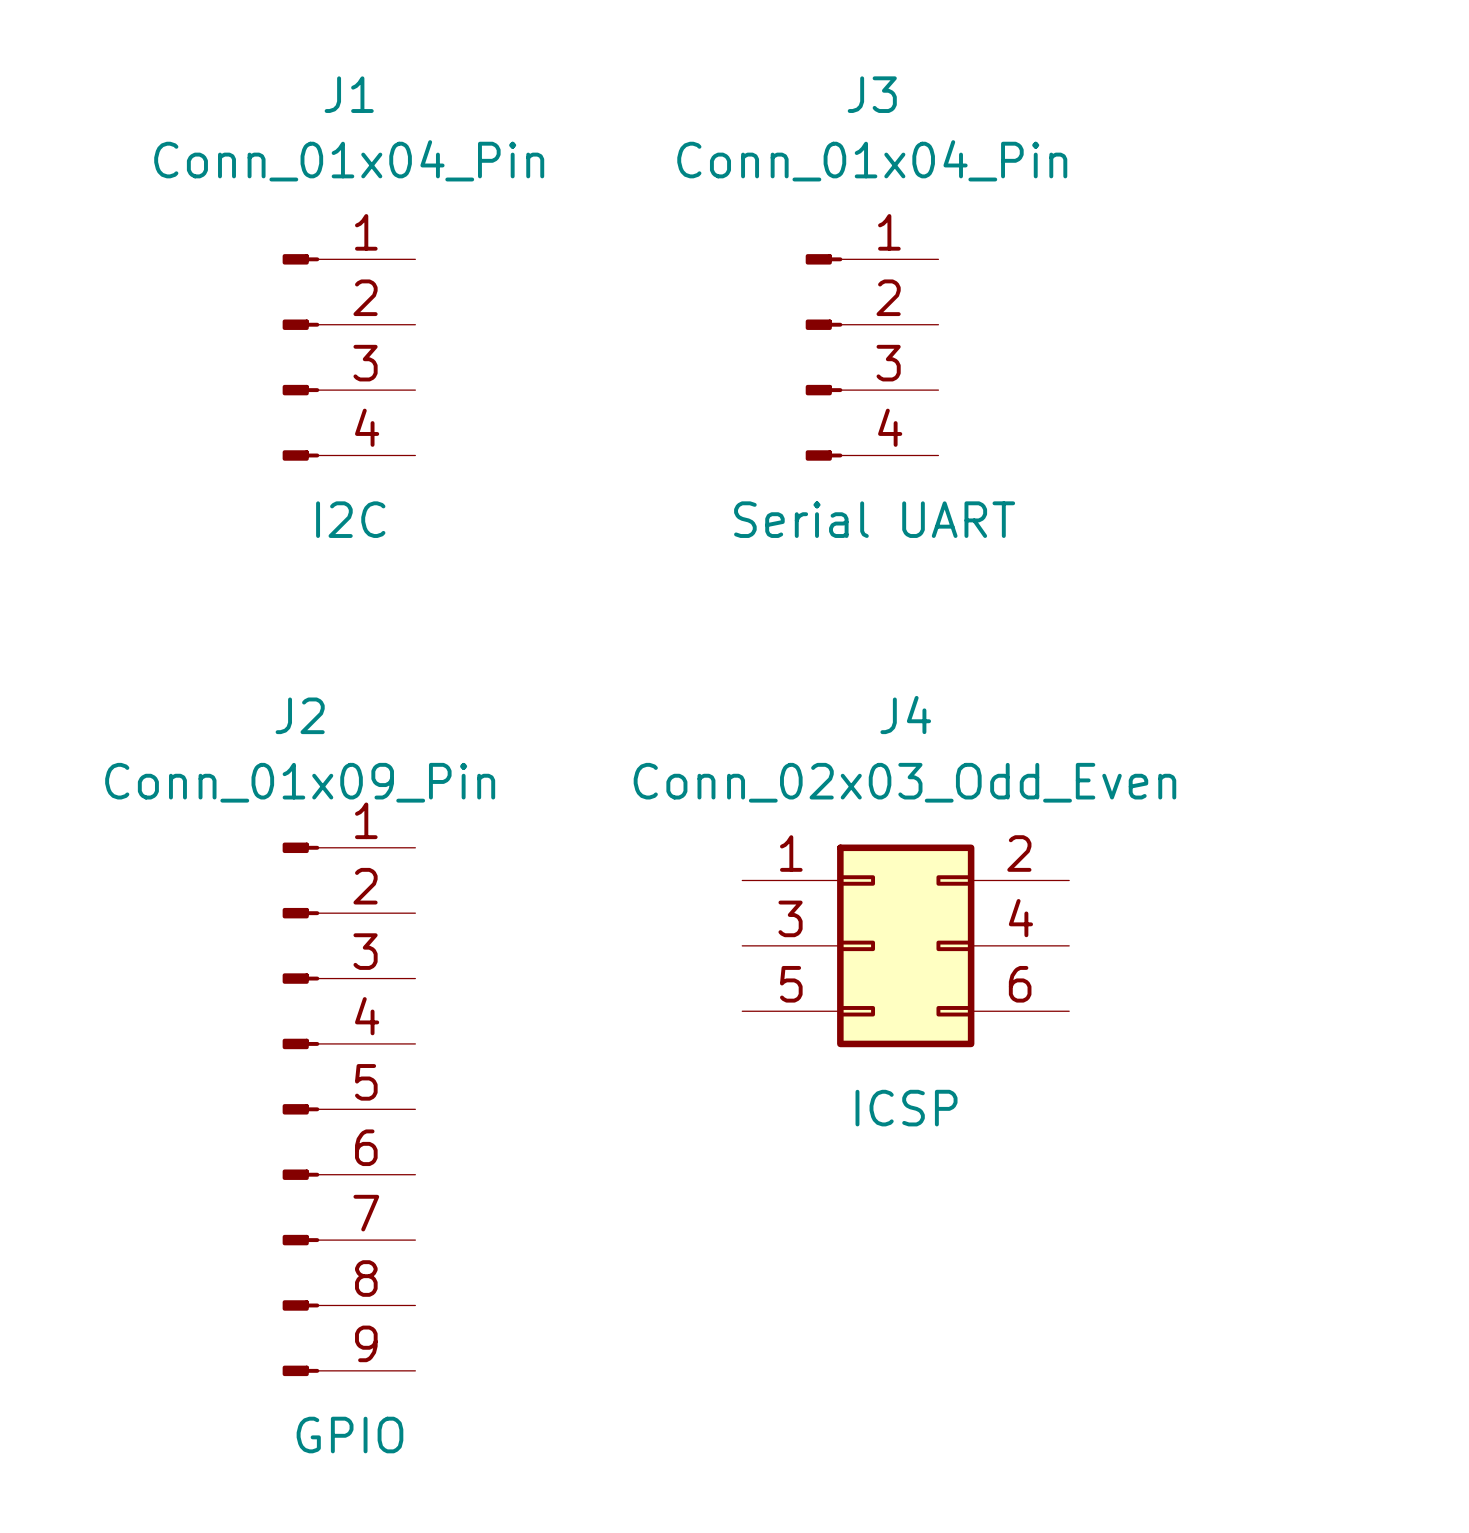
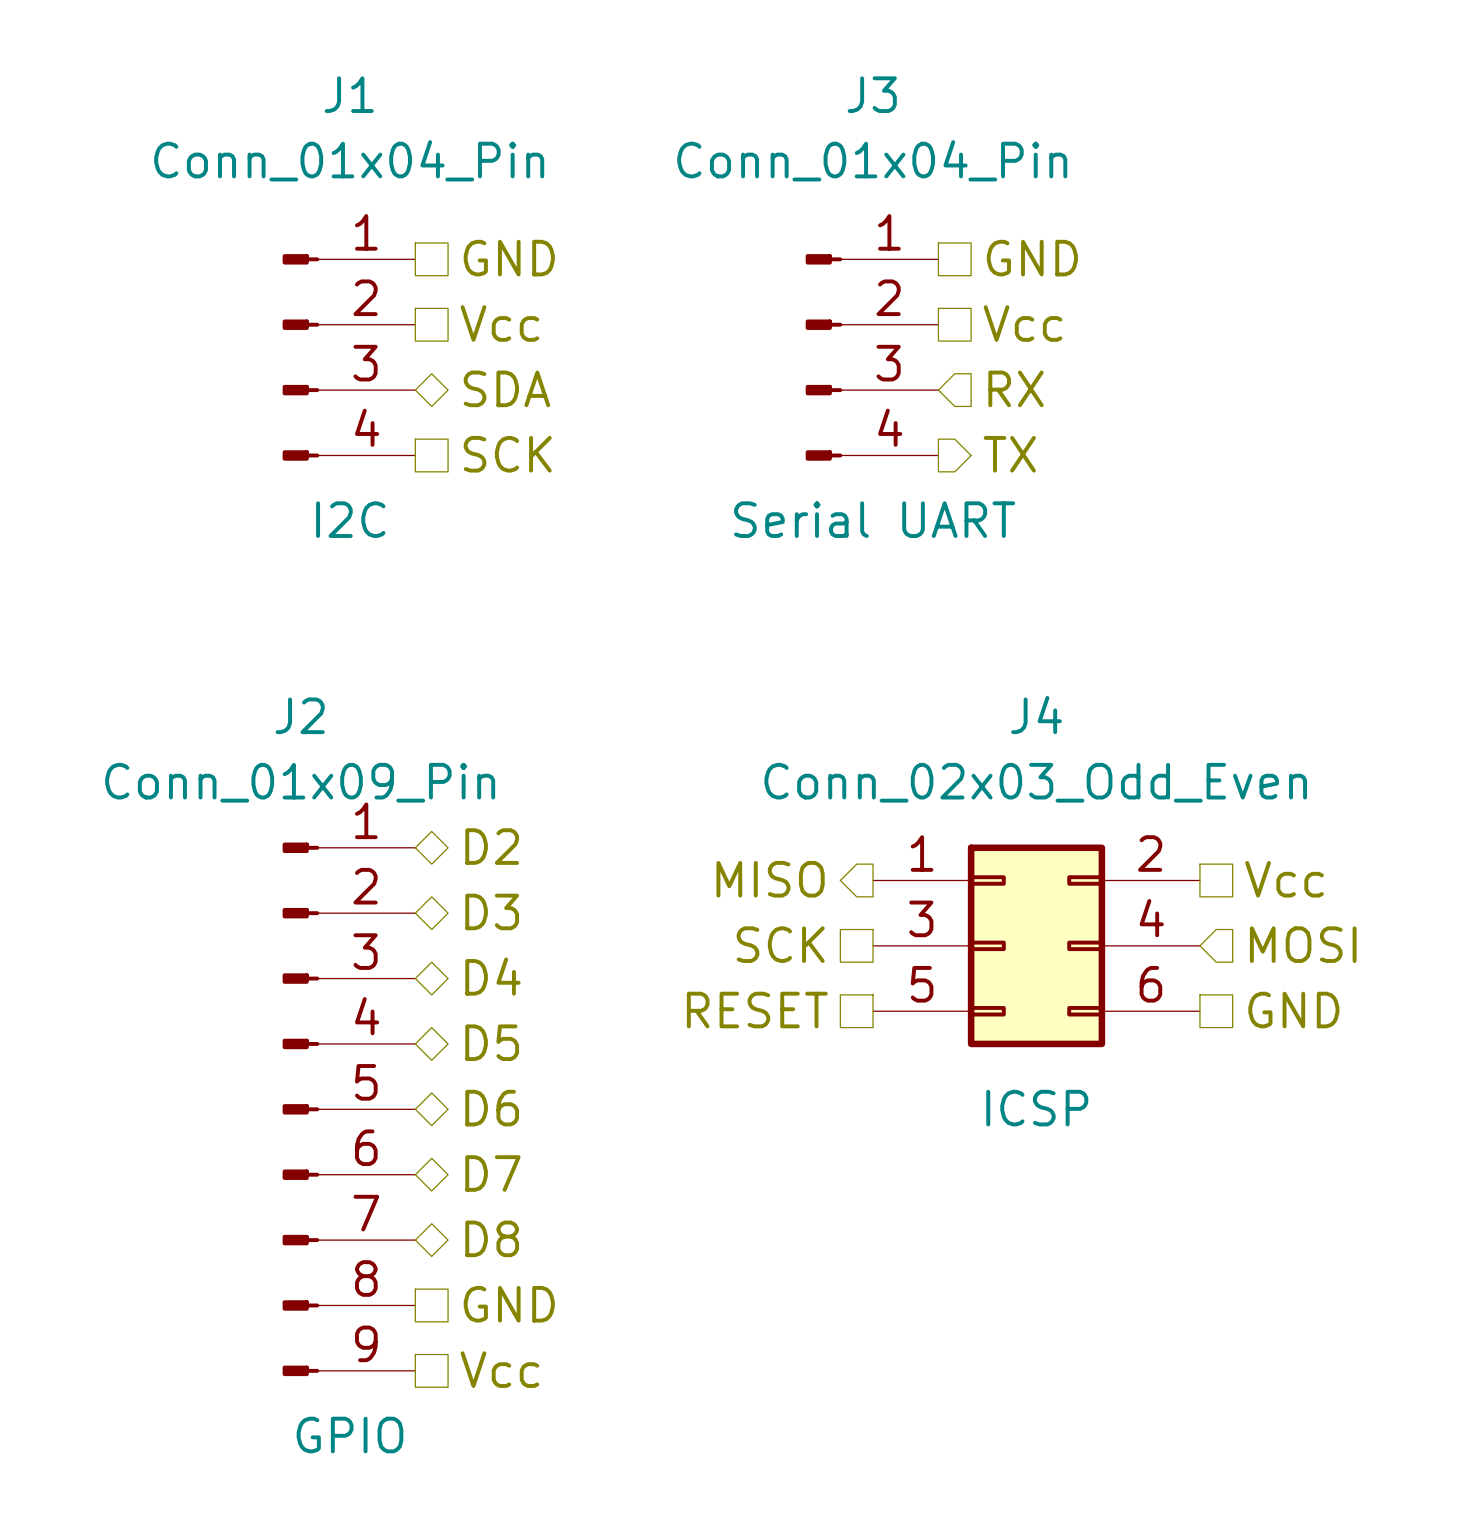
hierarchical label: none -> GND (509, 258)
hierarchical label: none -> GND (1032, 258)
hierarchical label: none -> Vcc (499, 323)
hierarchical label: none -> Vcc (1023, 323)
hierarchical label: none -> SDA (506, 388)
hierarchical label: none -> RX (1016, 388)
hierarchical label: none -> SCK (507, 454)
hierarchical label: none -> TX (1009, 454)
hierarchical label: none -> D2 (492, 846)
hierarchical label: none -> MISO (770, 879)
hierarchical label: none -> Vcc (1284, 879)
hierarchical label: none -> D3 (492, 911)
hierarchical label: none -> SCK (780, 944)
hierarchical label: none -> MOSI (1303, 944)
J4 position: (905, 945) -> (1036, 945)
hierarchical label: none -> D4 (492, 976)
hierarchical label: none -> RESET (757, 1010)
hierarchical label: none -> GND (1293, 1010)
hierarchical label: none -> D5 (492, 1042)
hierarchical label: none -> D6 (492, 1108)
hierarchical label: none -> D7 (492, 1173)
hierarchical label: none -> D8 (492, 1238)
hierarchical label: none -> GND (509, 1304)
hierarchical label: none -> Vcc (499, 1369)

